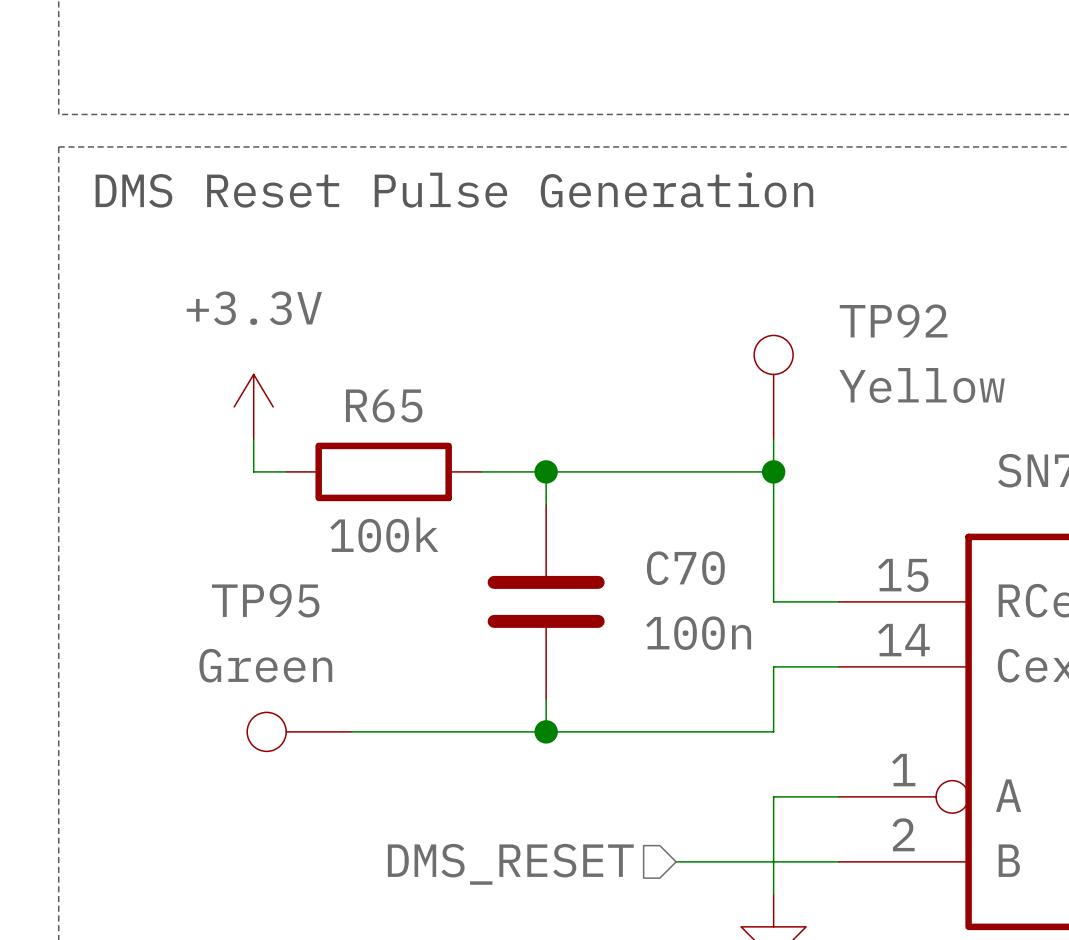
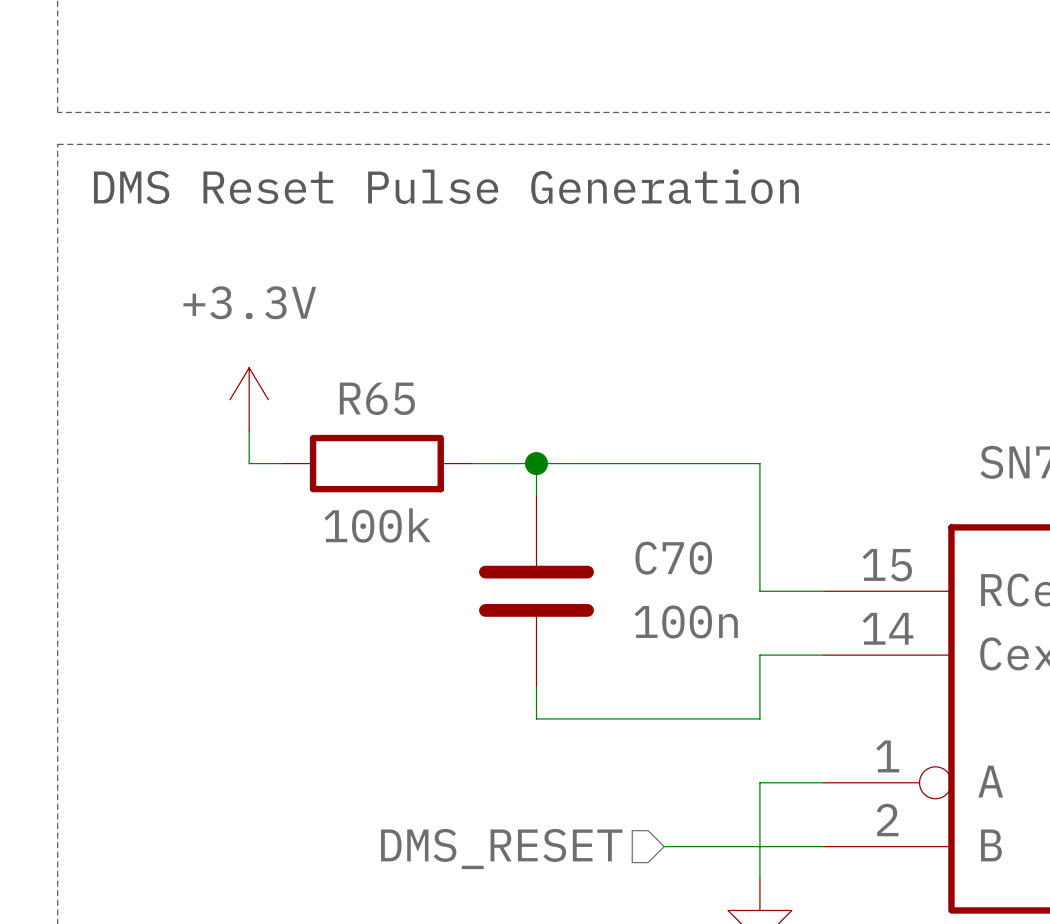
TP92: Yellow (773, 387) -> none
wire: (773, 439) (773, 471) -> none
junction: (773, 471) -> none
TP95: Green (299, 731) -> none
wire: (351, 731) (546, 731) -> none
junction: (546, 731) -> none

